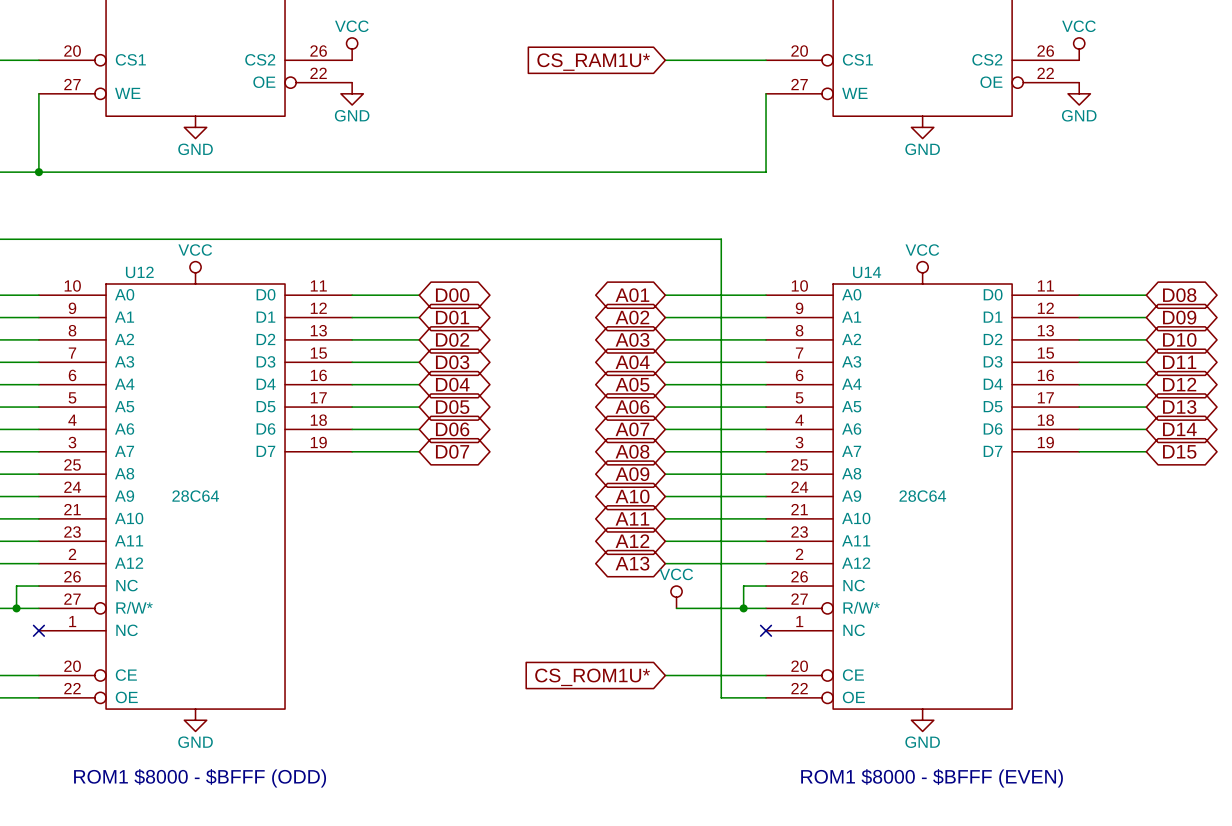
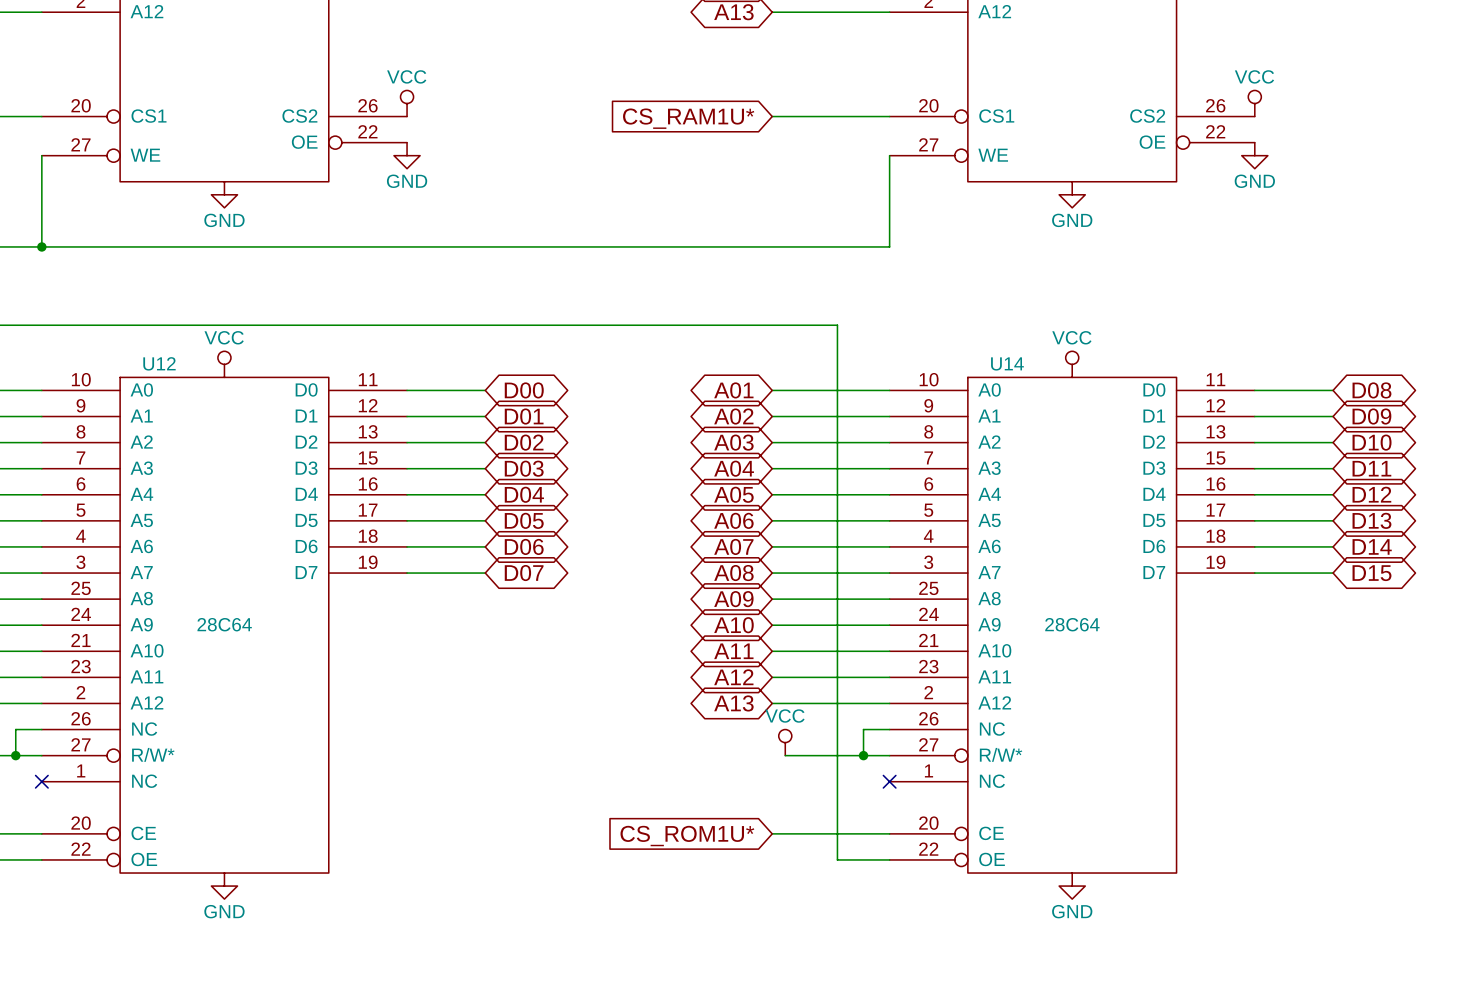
text: ROM1 $8000 - $BFFF (ODD) (200, 778) -> none
text: ROM1 $8000 - $BFFF (EVEN) (932, 778) -> none

